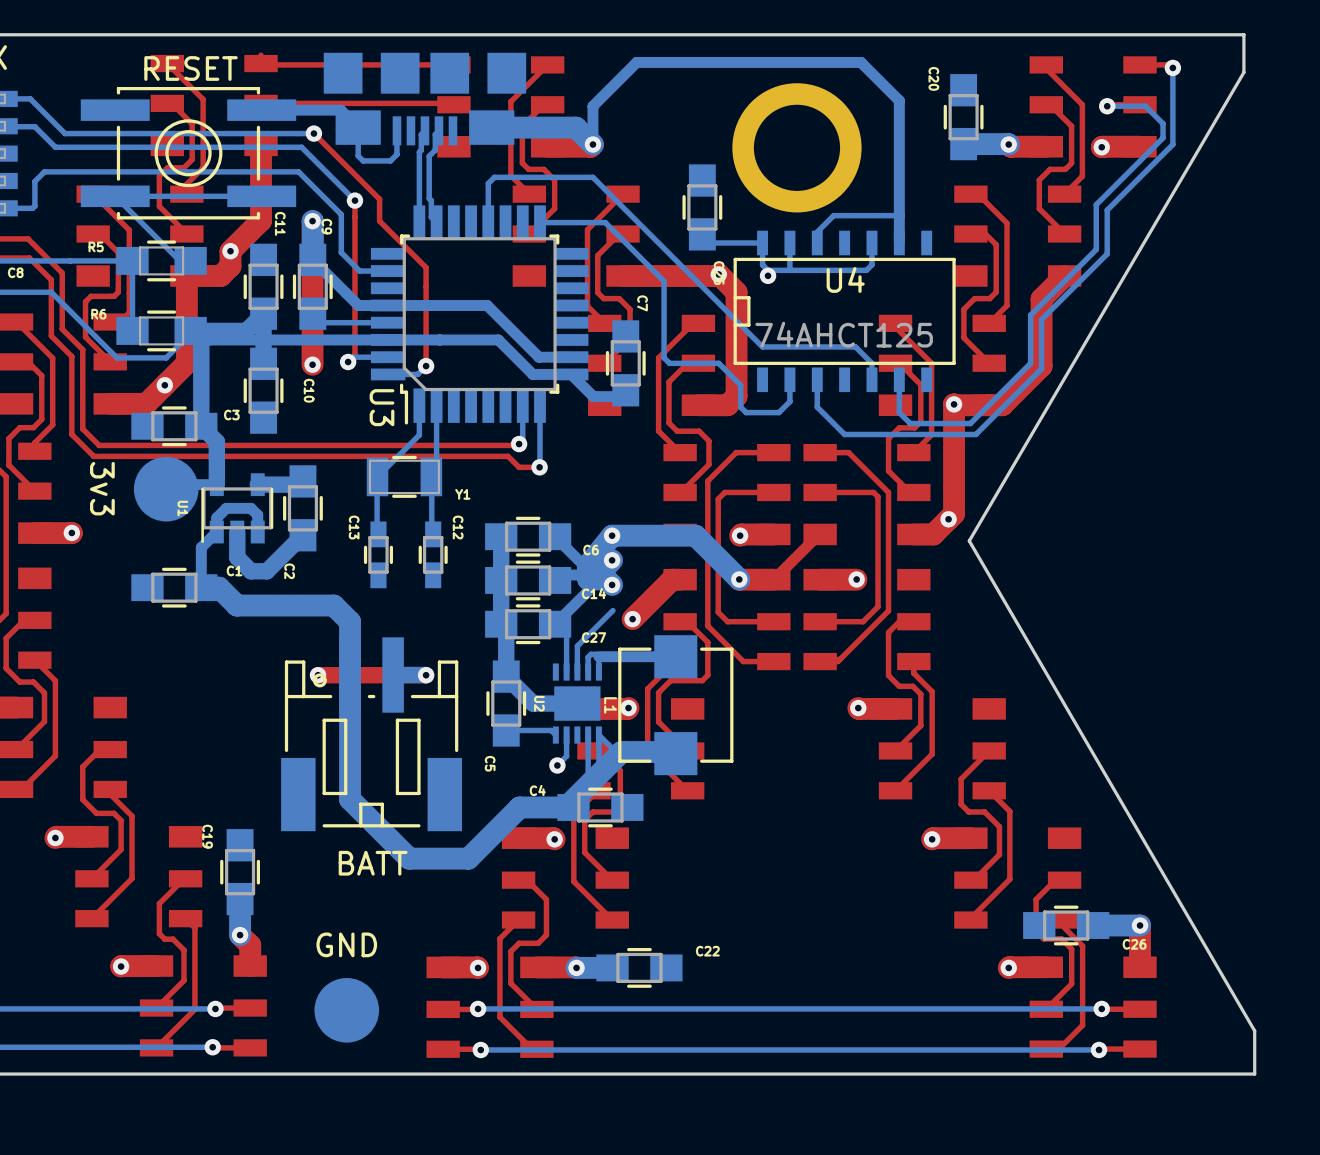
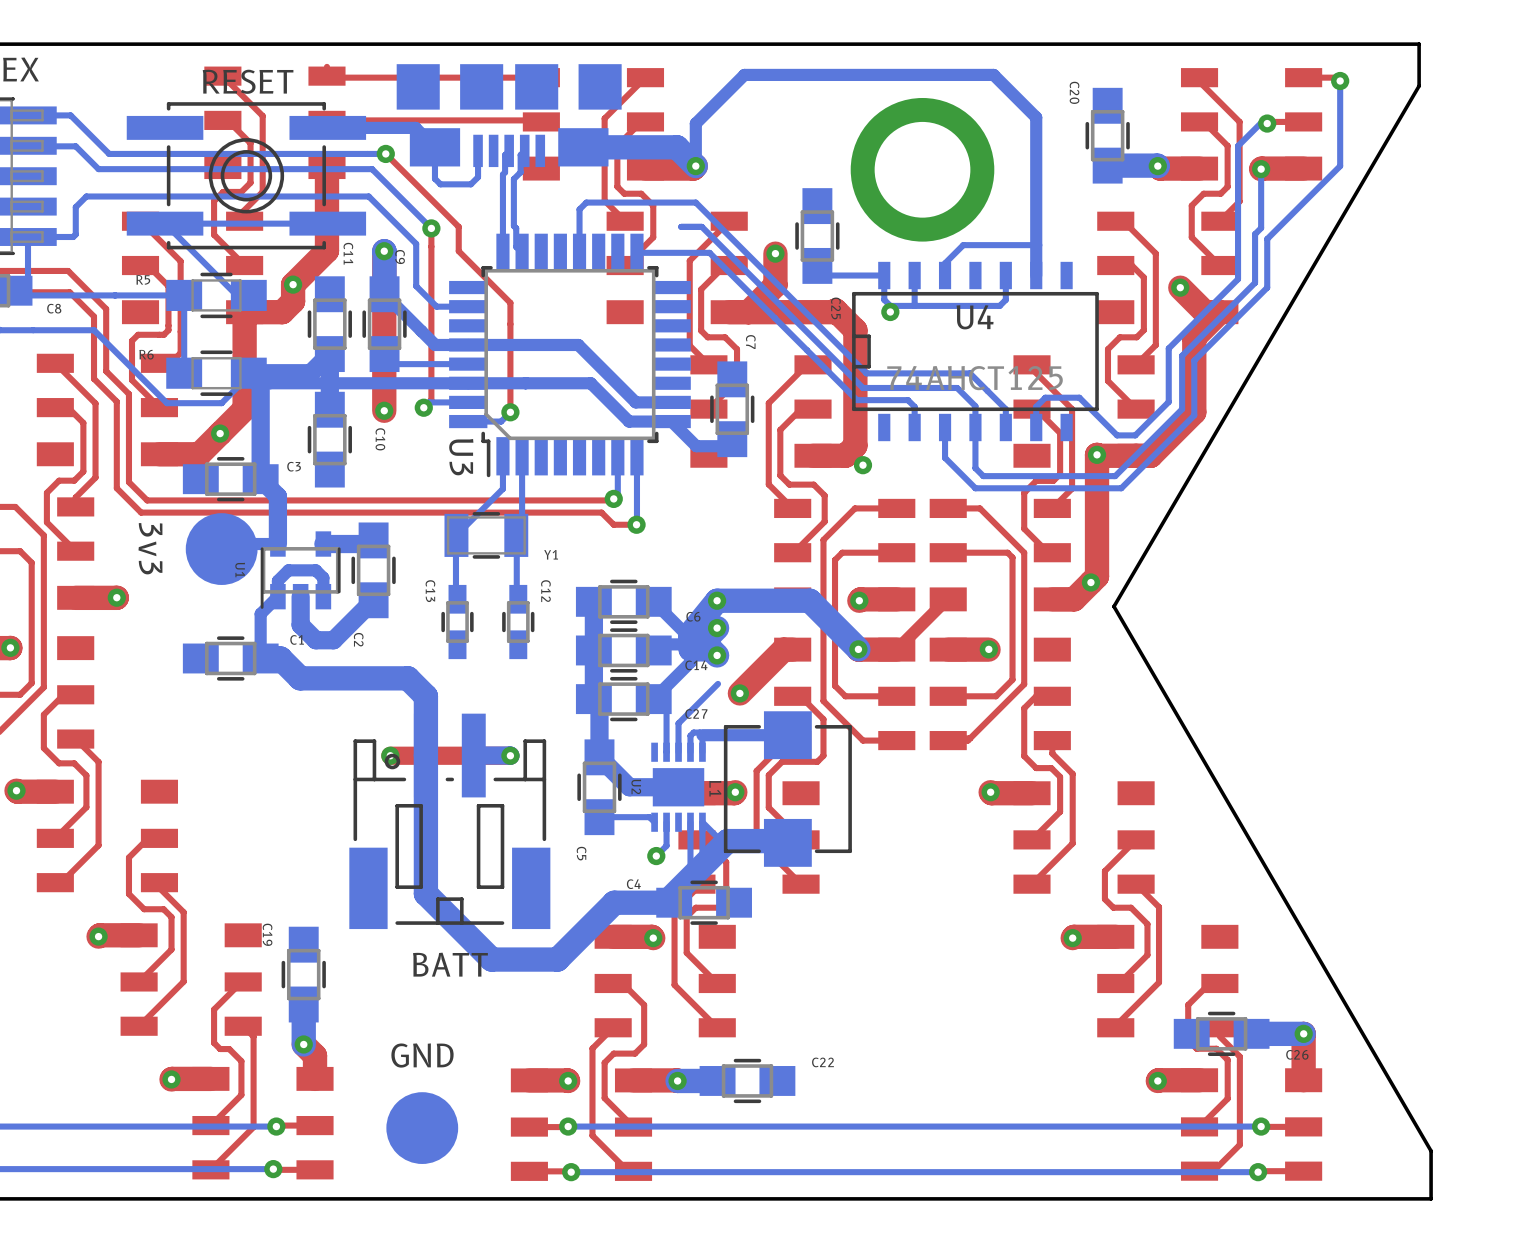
bottom track: none -> (1261, 122) (1238, 146) (1238, 279) (1168, 348) (1168, 401) (1135, 435) (1117, 435) (1079, 397) (1045, 397) (1036, 406) (1036, 427)
bottom track: (1107, 106) (1145, 106) (1163, 123) (1163, 137) (1096, 205) -> (1261, 169) (1261, 228) (1255, 234)
top track: none -> (775, 253) (775, 285) (748, 312)
via: none -> (775, 253)
top track: none -> (1180, 287) (1204, 312) (1219, 312)
via: none -> (1180, 287)
via: (718, 274) -> none
bottom track: (664, 281) (664, 357) (669, 363) (718, 363) (740, 385) (740, 407) (746, 412) (778, 412) (789, 401) (789, 379) -> (774, 318) (856, 400) (907, 400) (914, 406) (914, 427)
bottom track: (746, 331) (762, 346) (855, 346) -> (866, 373) (969, 373) (987, 391)
bottom track: (899, 379) (899, 412) (910, 423) -> (681, 226) (701, 226) (862, 387) (957, 387) (975, 406) (975, 468) (983, 476) (1048, 476)
via: none -> (862, 465)

